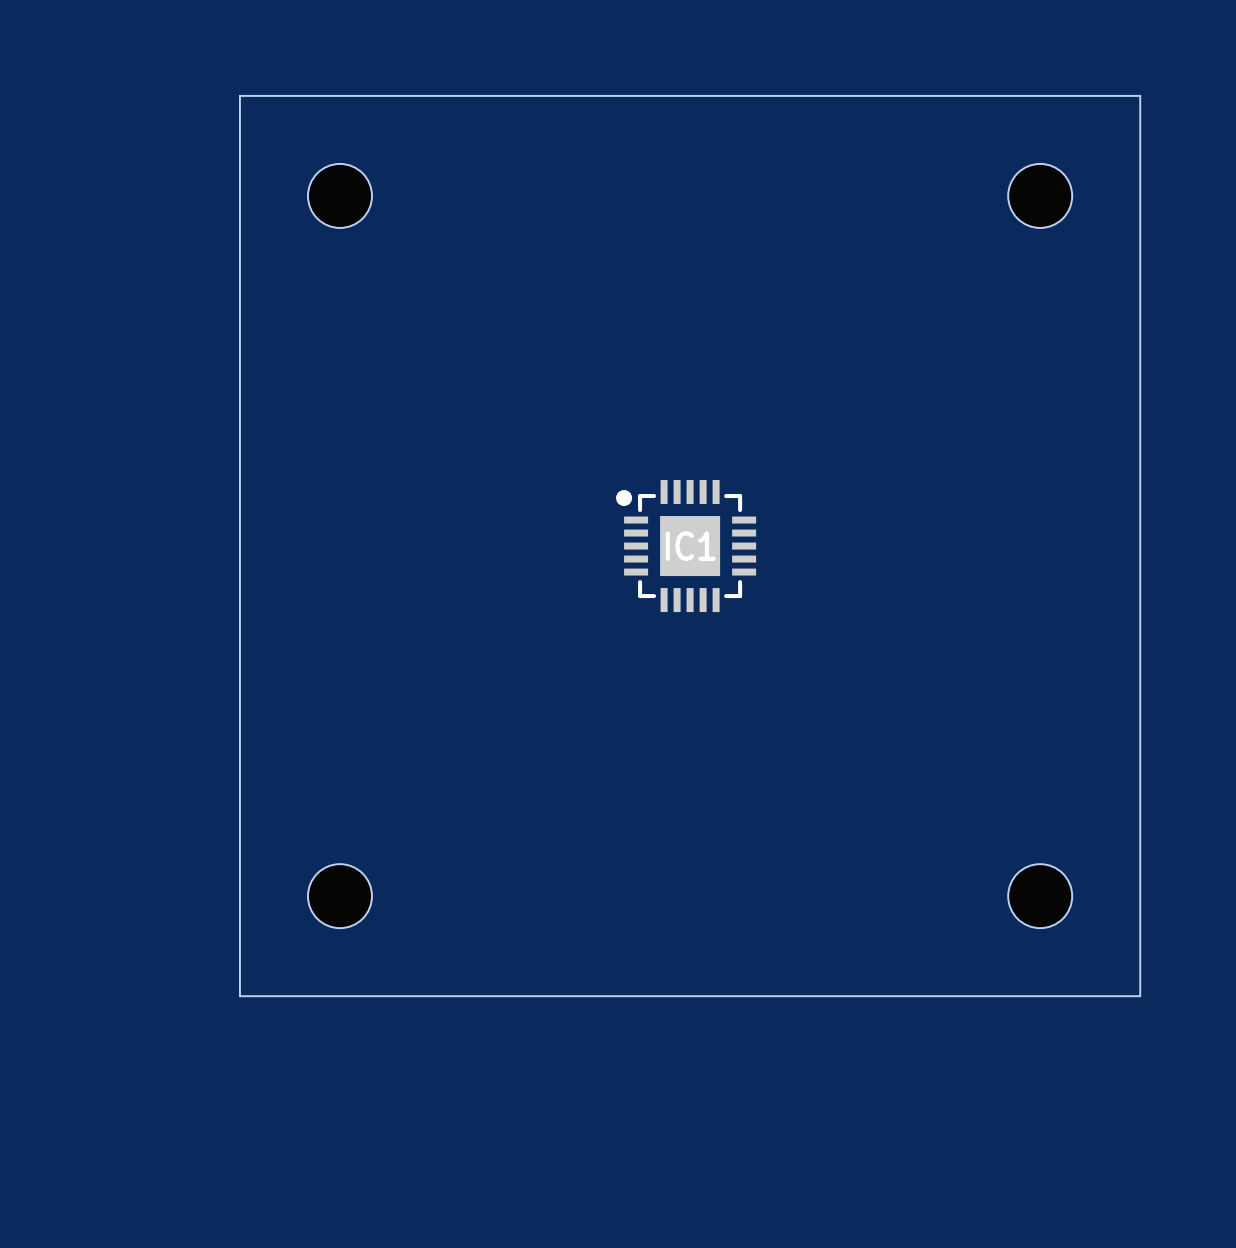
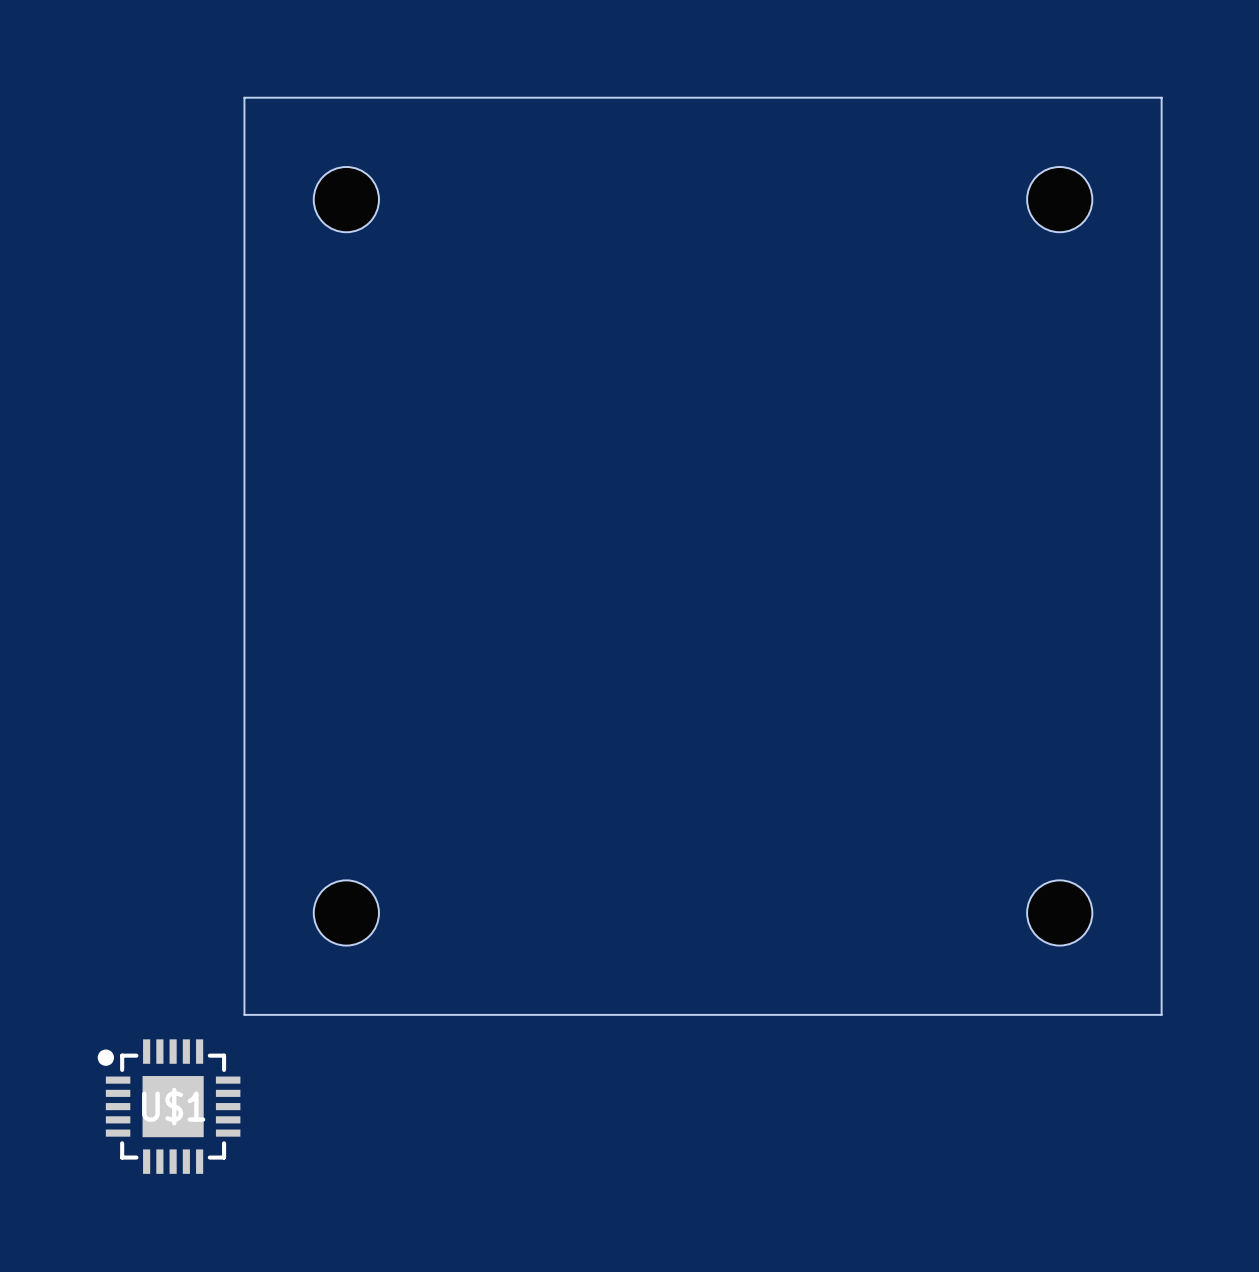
part: (686, 546) -> none
part: none -> (169, 1106)

